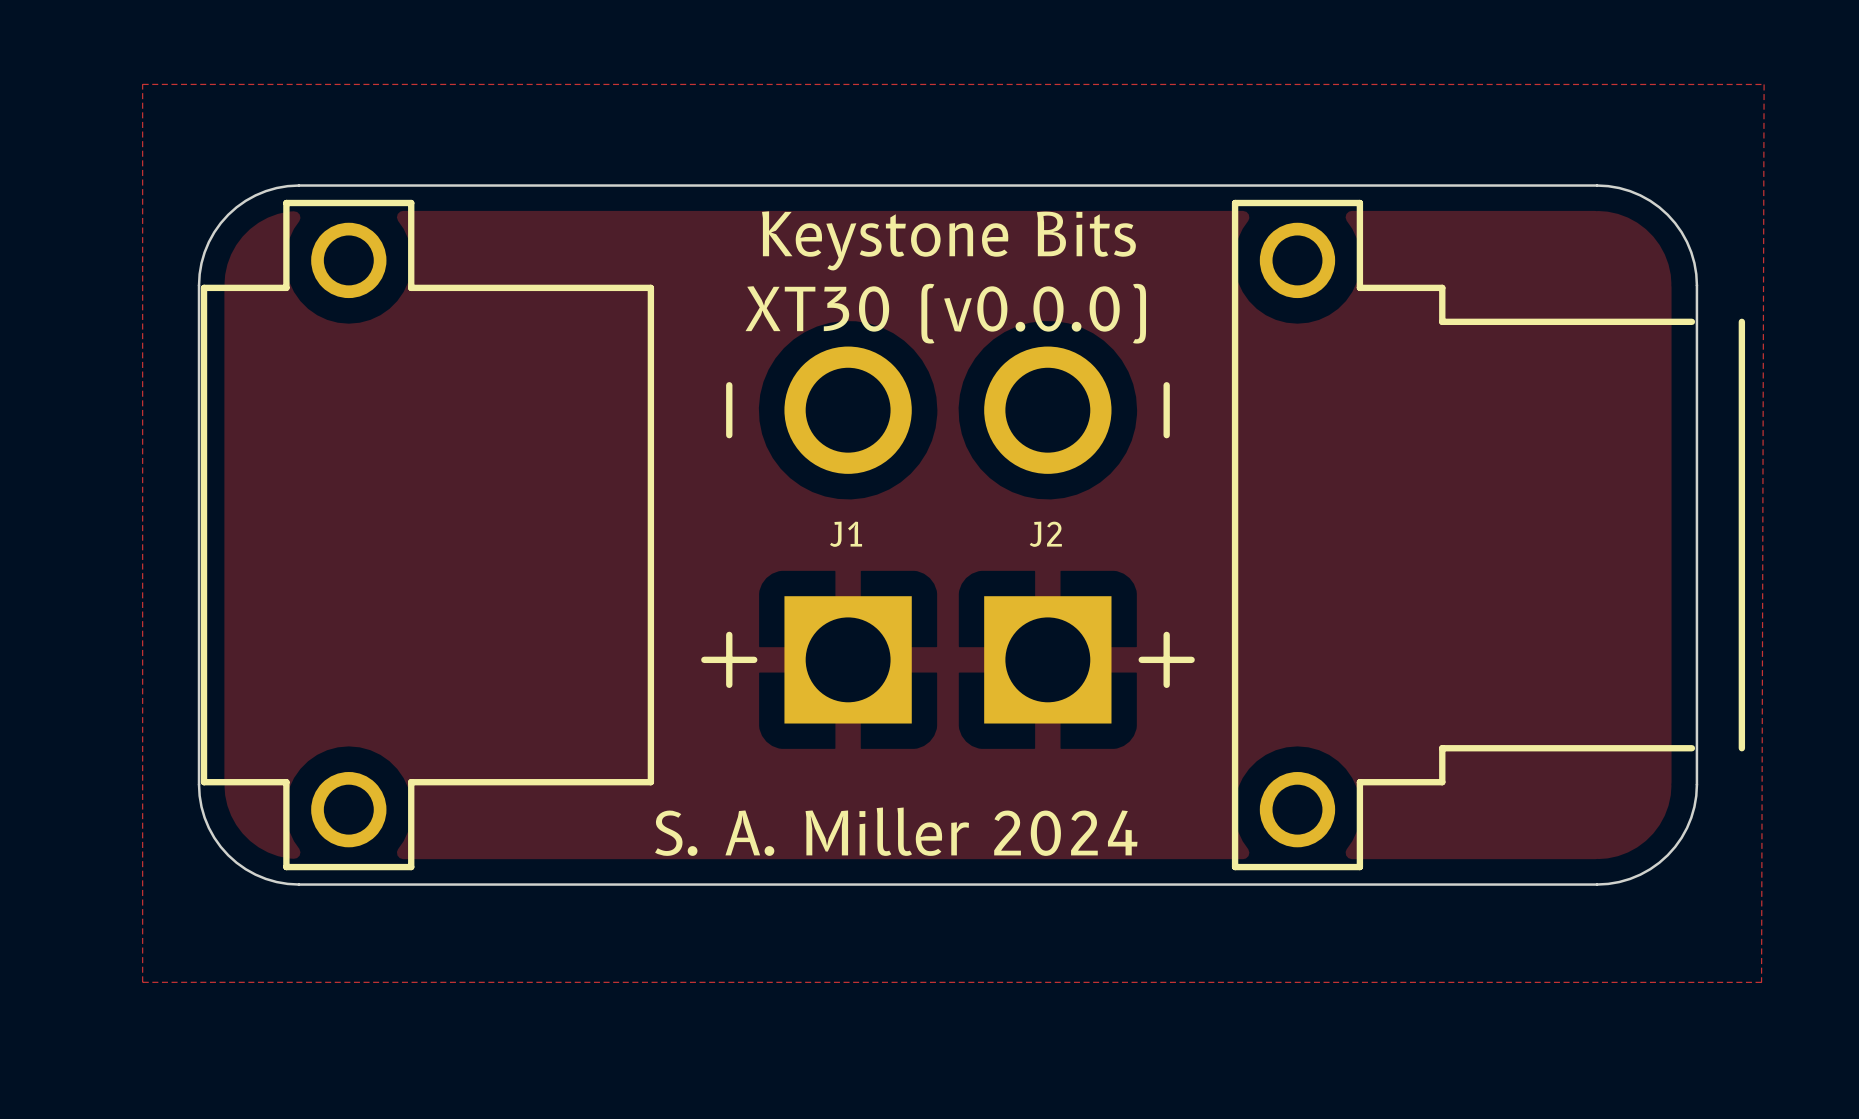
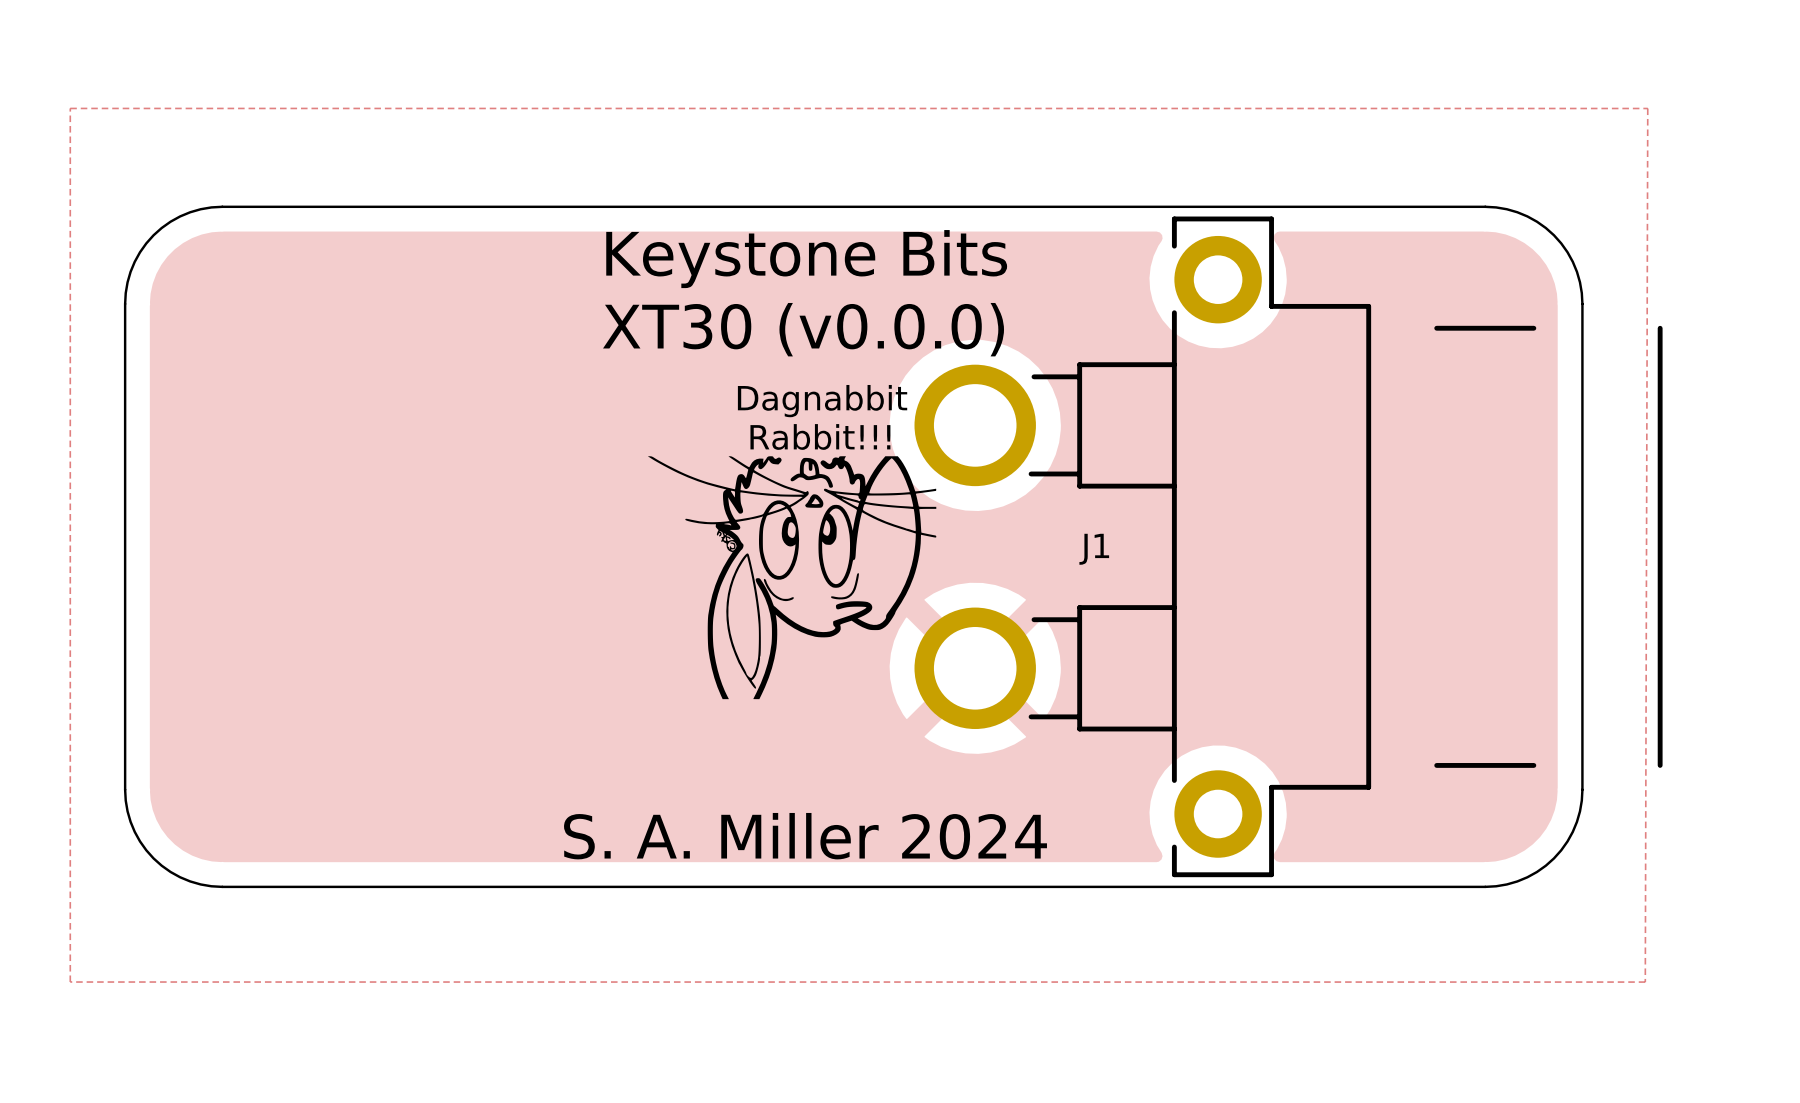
J1 footprint: [200, 199, 912, 871] -> [914, 216, 1663, 878]
text position: Keystone Bits (948, 240) -> Keystone Bits (806, 259)
text position: XT30 (v0.0.0) (945, 313) -> XT30 (v0.0.0) (803, 329)
drawing: none -> [647, 456, 937, 700]
J1 name position: J1 (846, 534) -> J1 (1094, 549)
J2: (1364, 535) -> none

